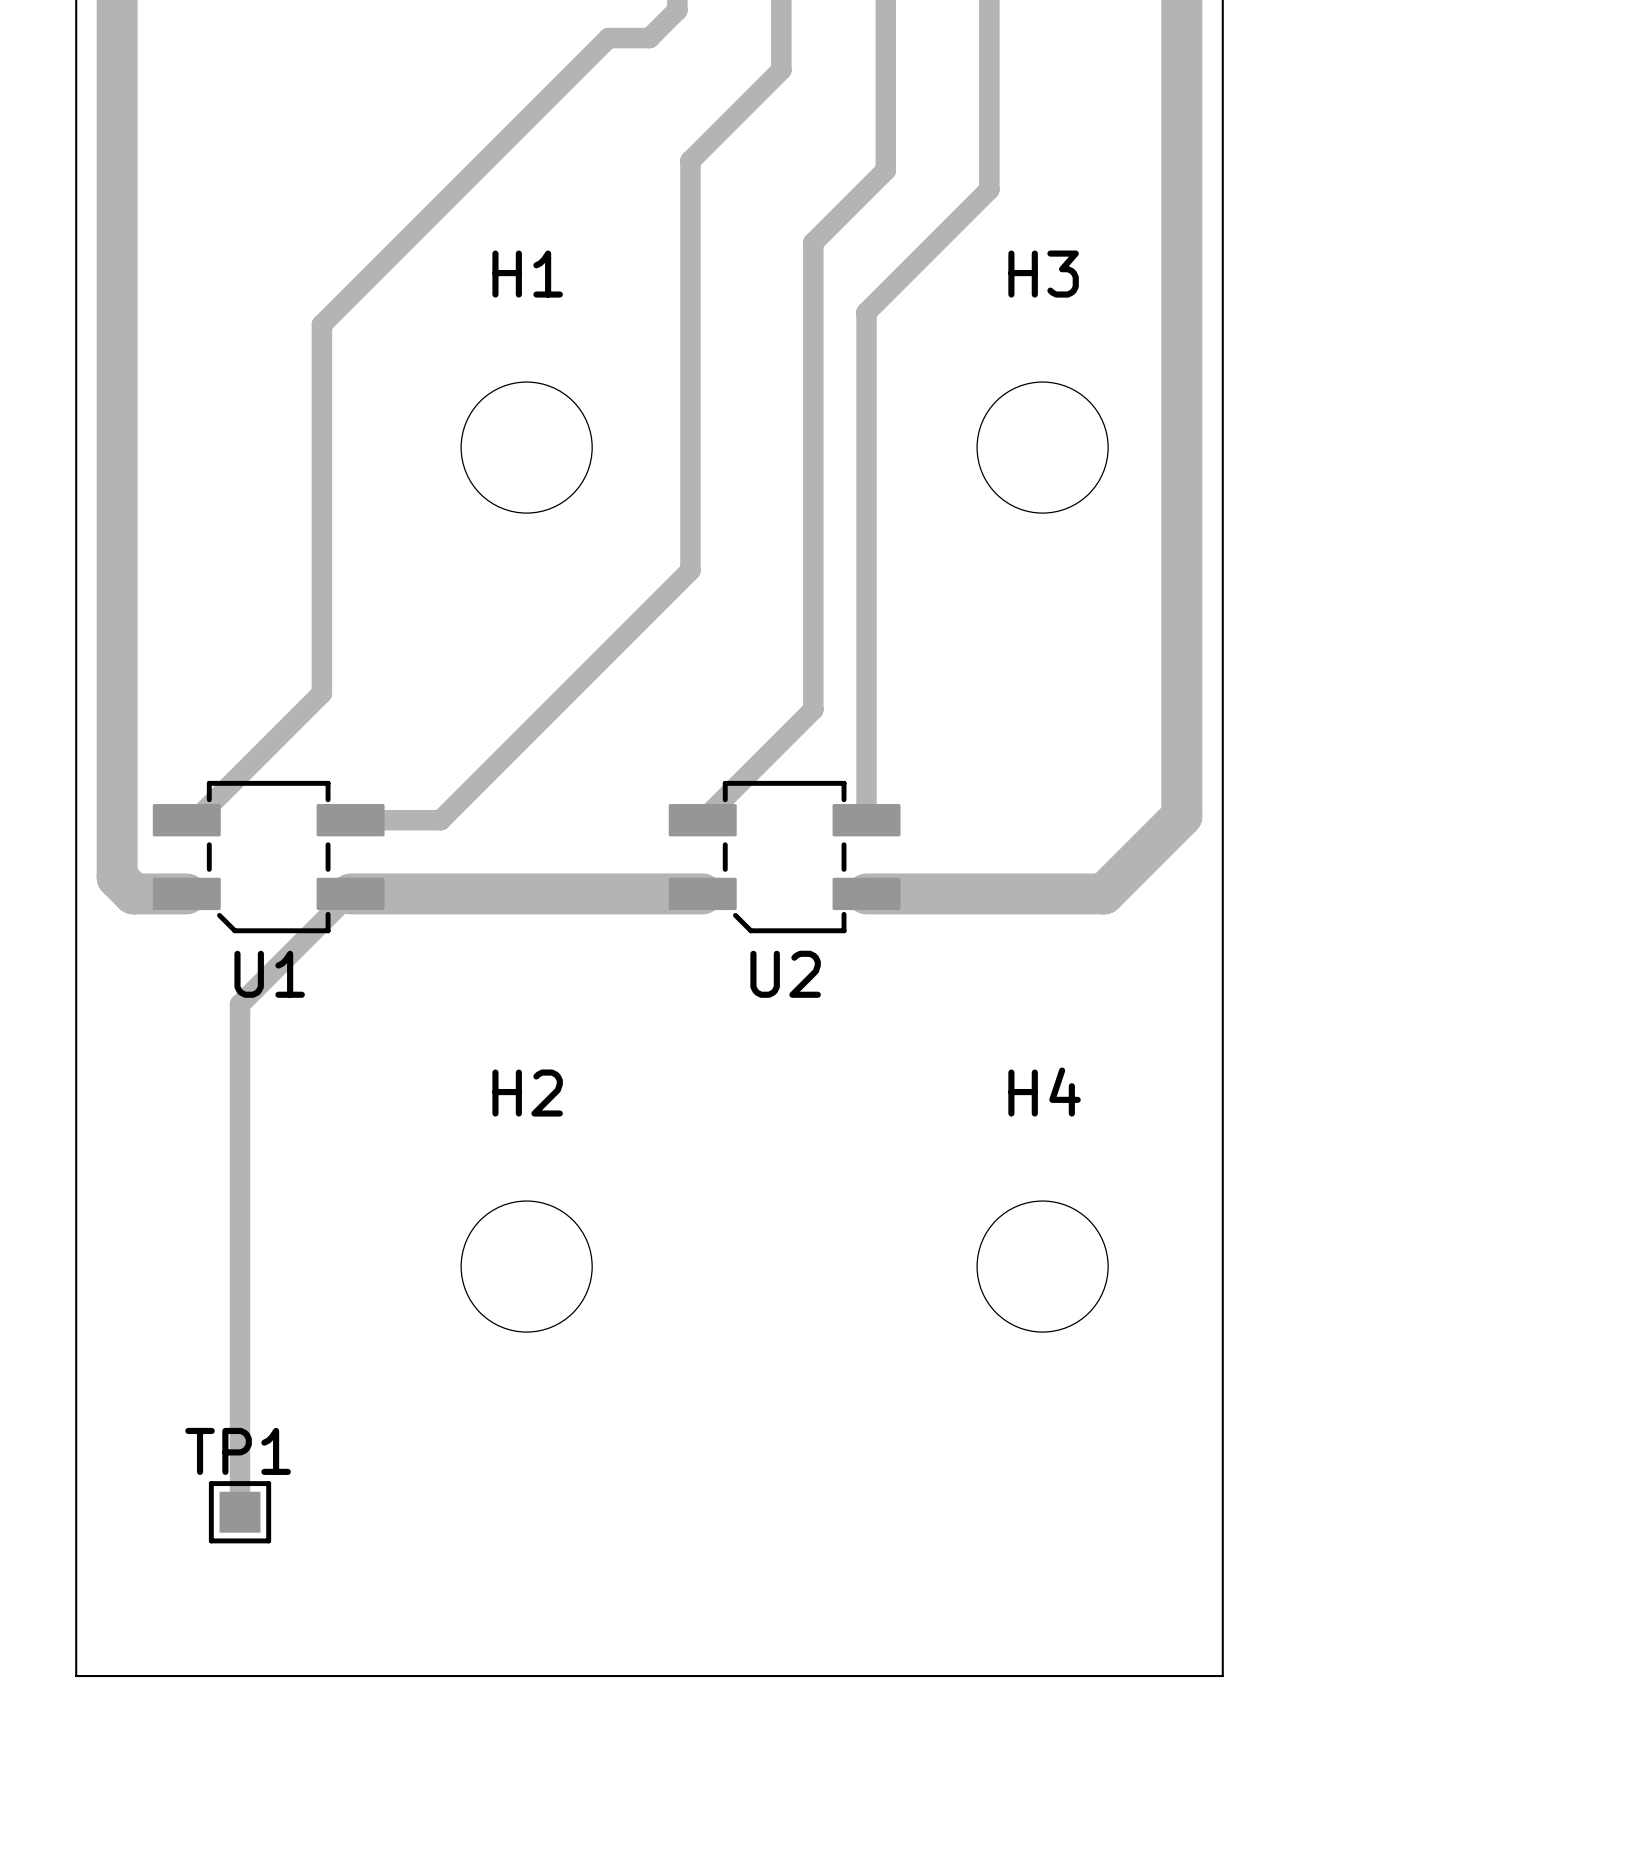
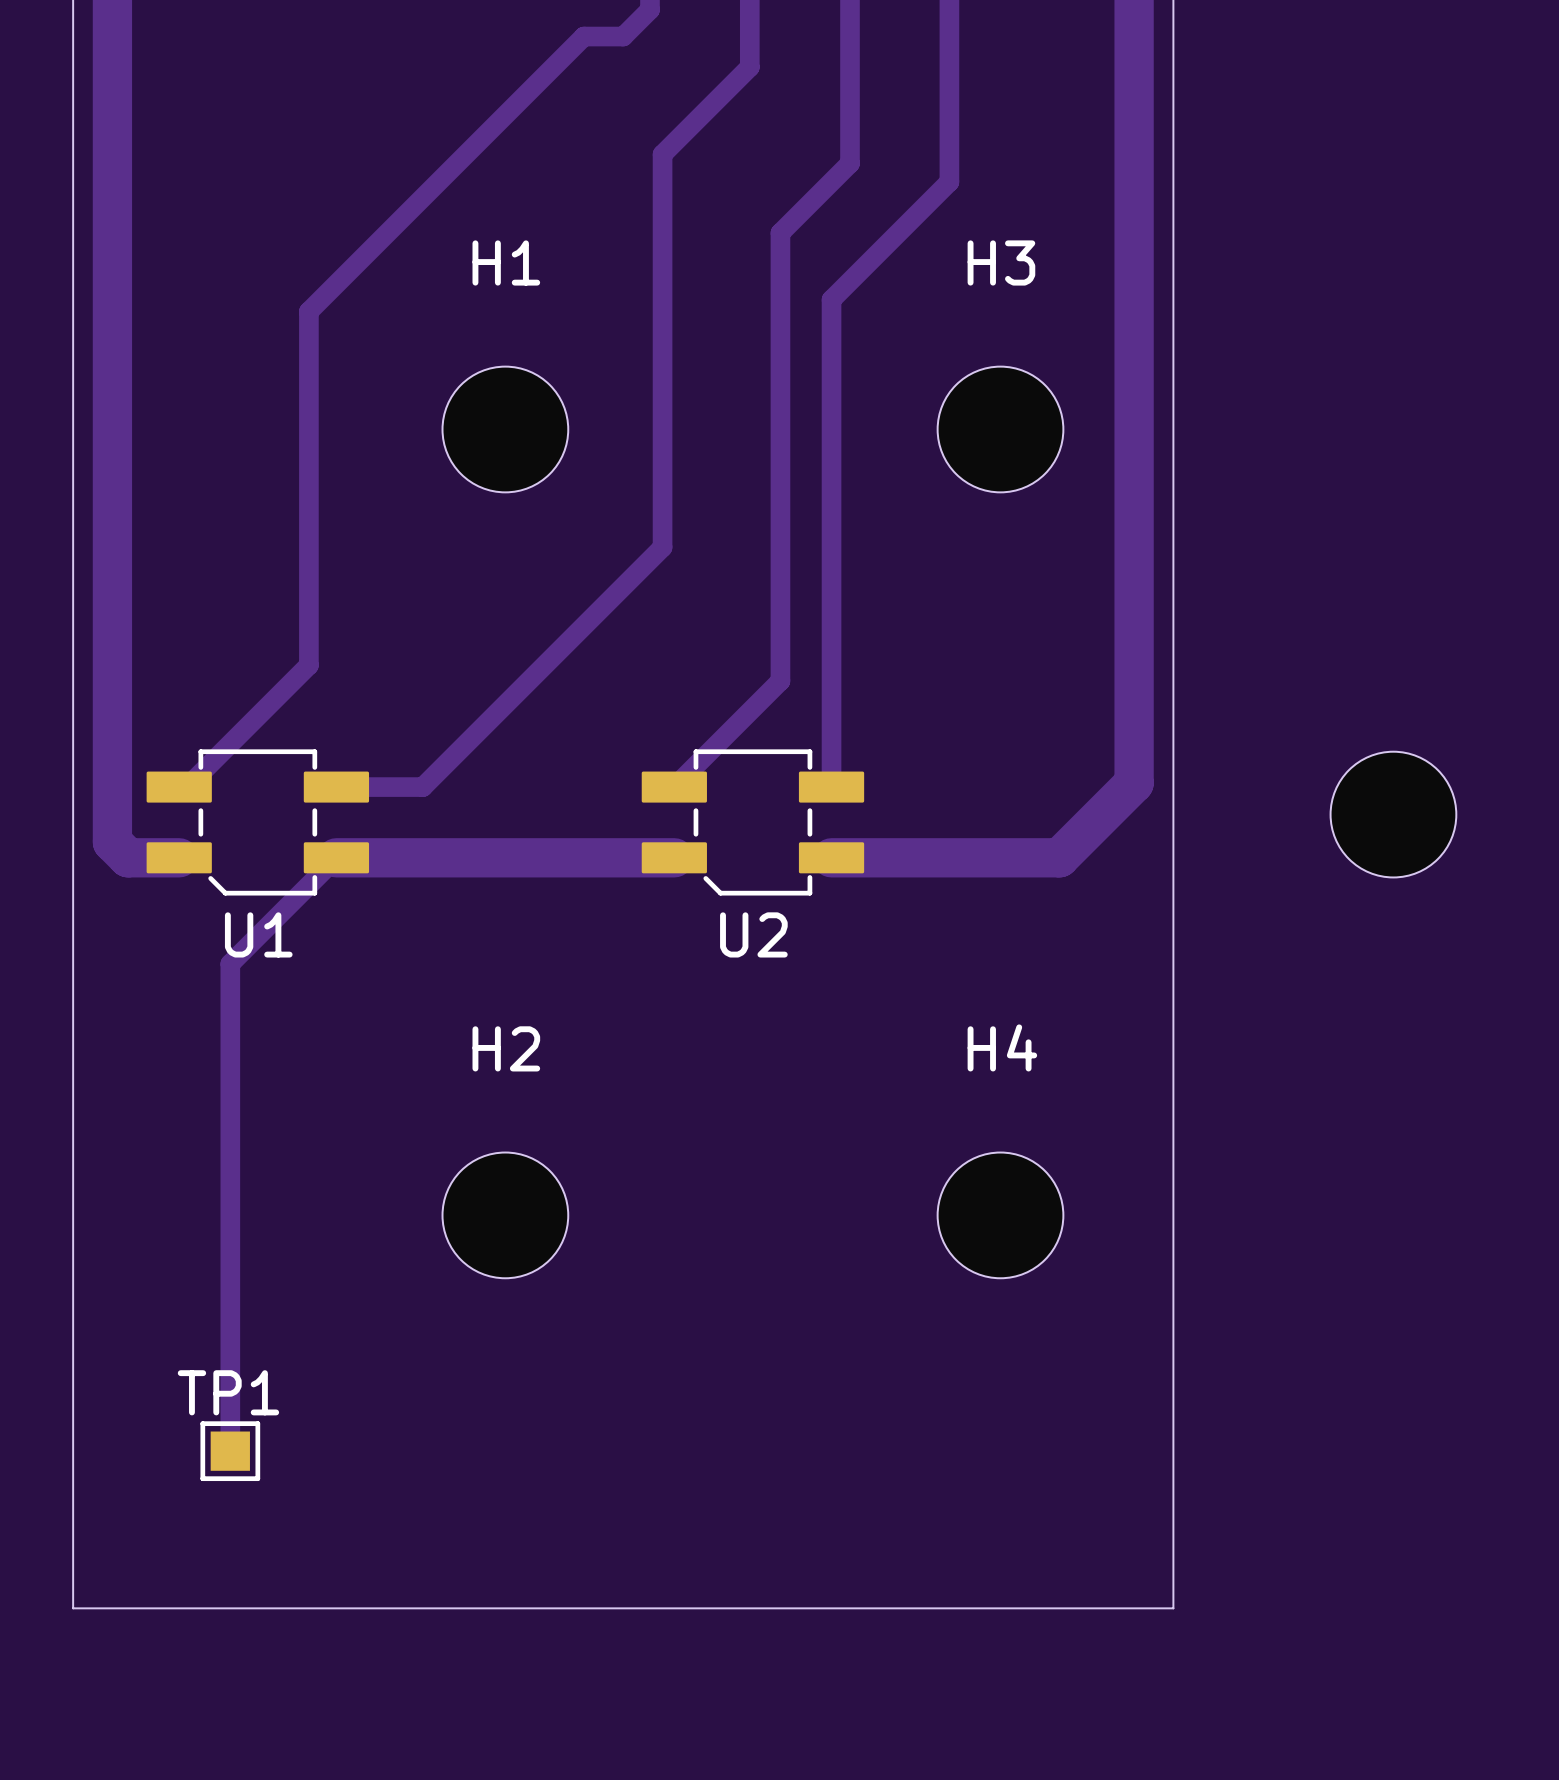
part: none -> (1393, 814)

